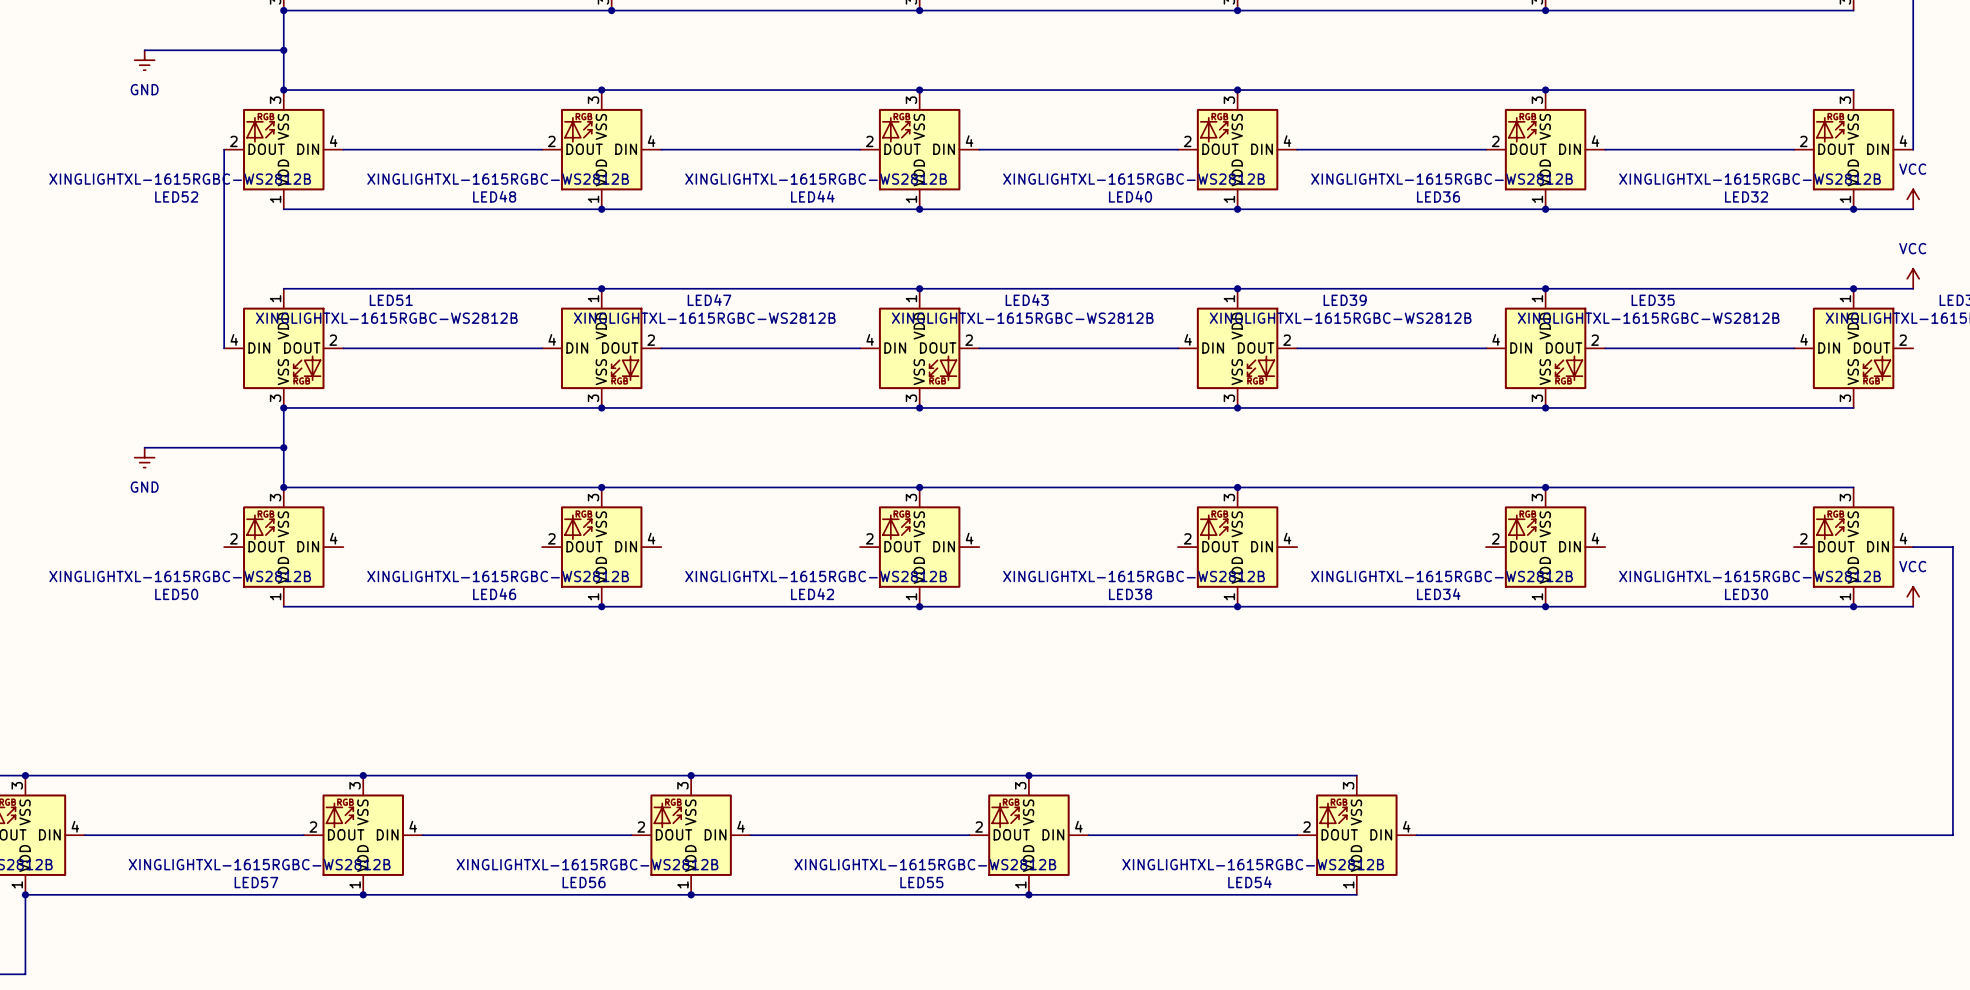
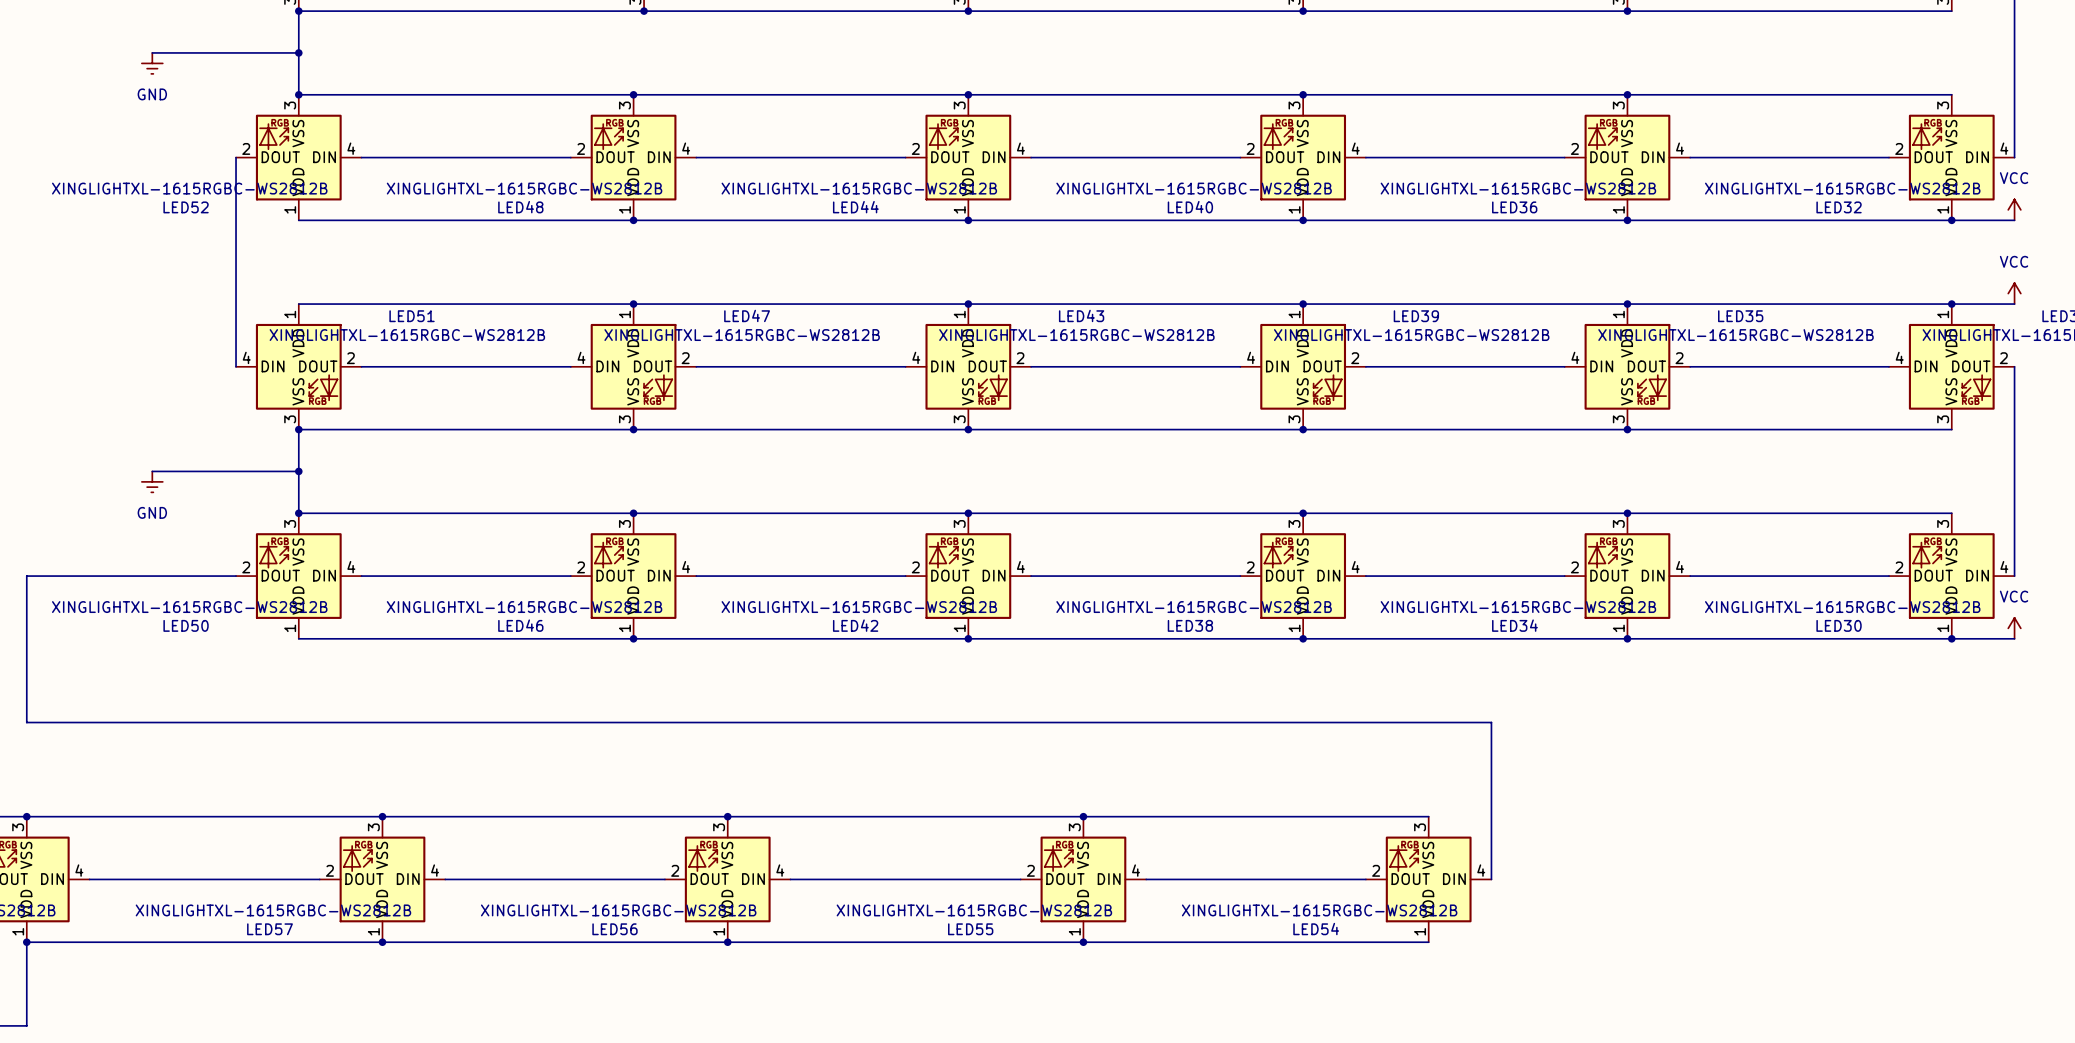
wire: none -> (236, 576) (26, 576) (26, 722) (1491, 722) (1491, 879)
wire: none -> (361, 576) (570, 576)
wire: none -> (696, 576) (905, 576)
wire: none -> (1031, 576) (1240, 576)
wire: none -> (1365, 576) (1564, 576)
wire: none -> (1690, 576) (1889, 576)
wire: (1913, 547) (1952, 547) (1952, 835) (1416, 835) -> (2014, 576) (2014, 366)

